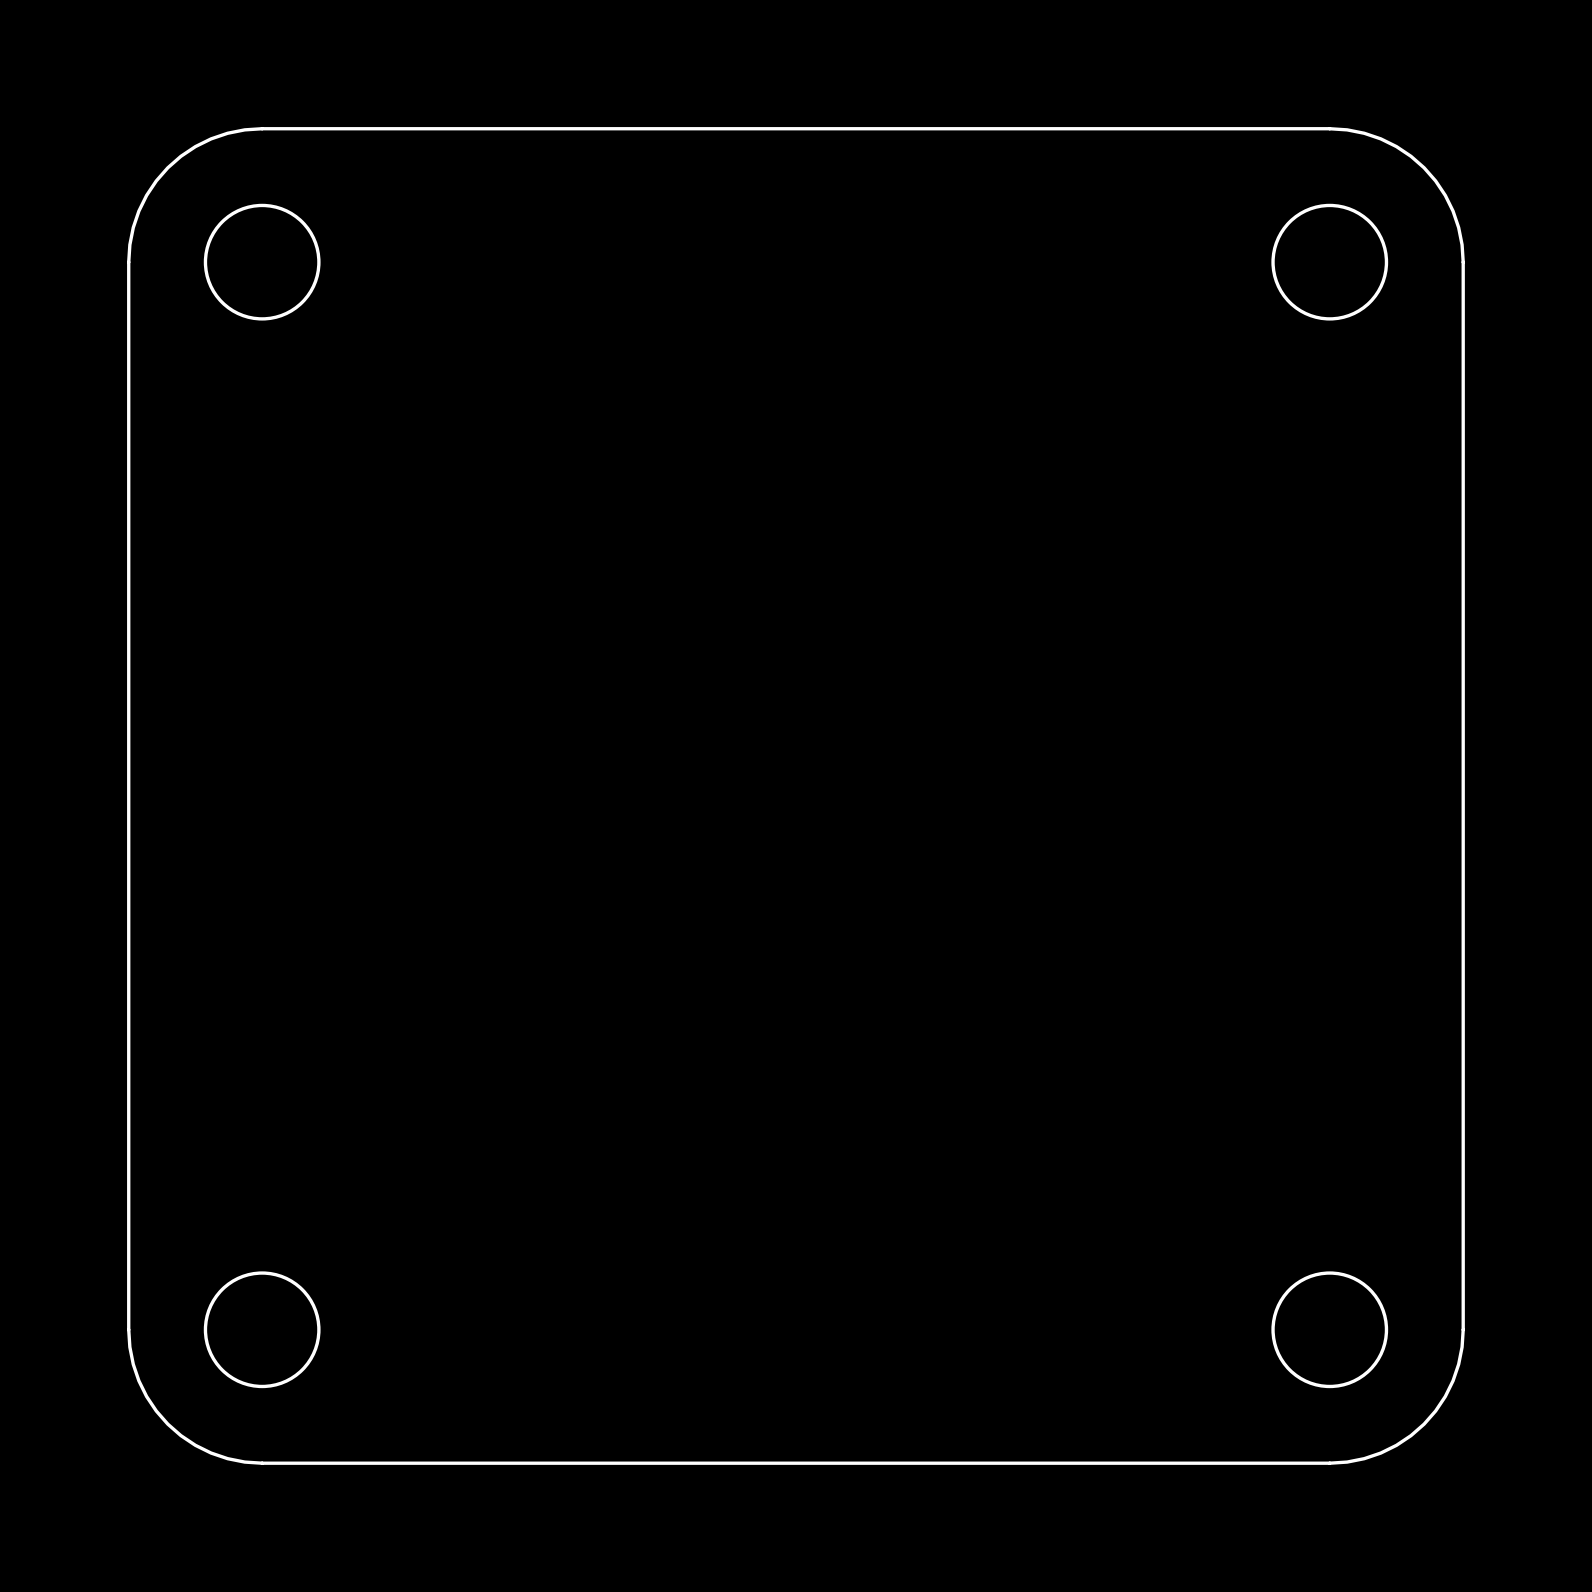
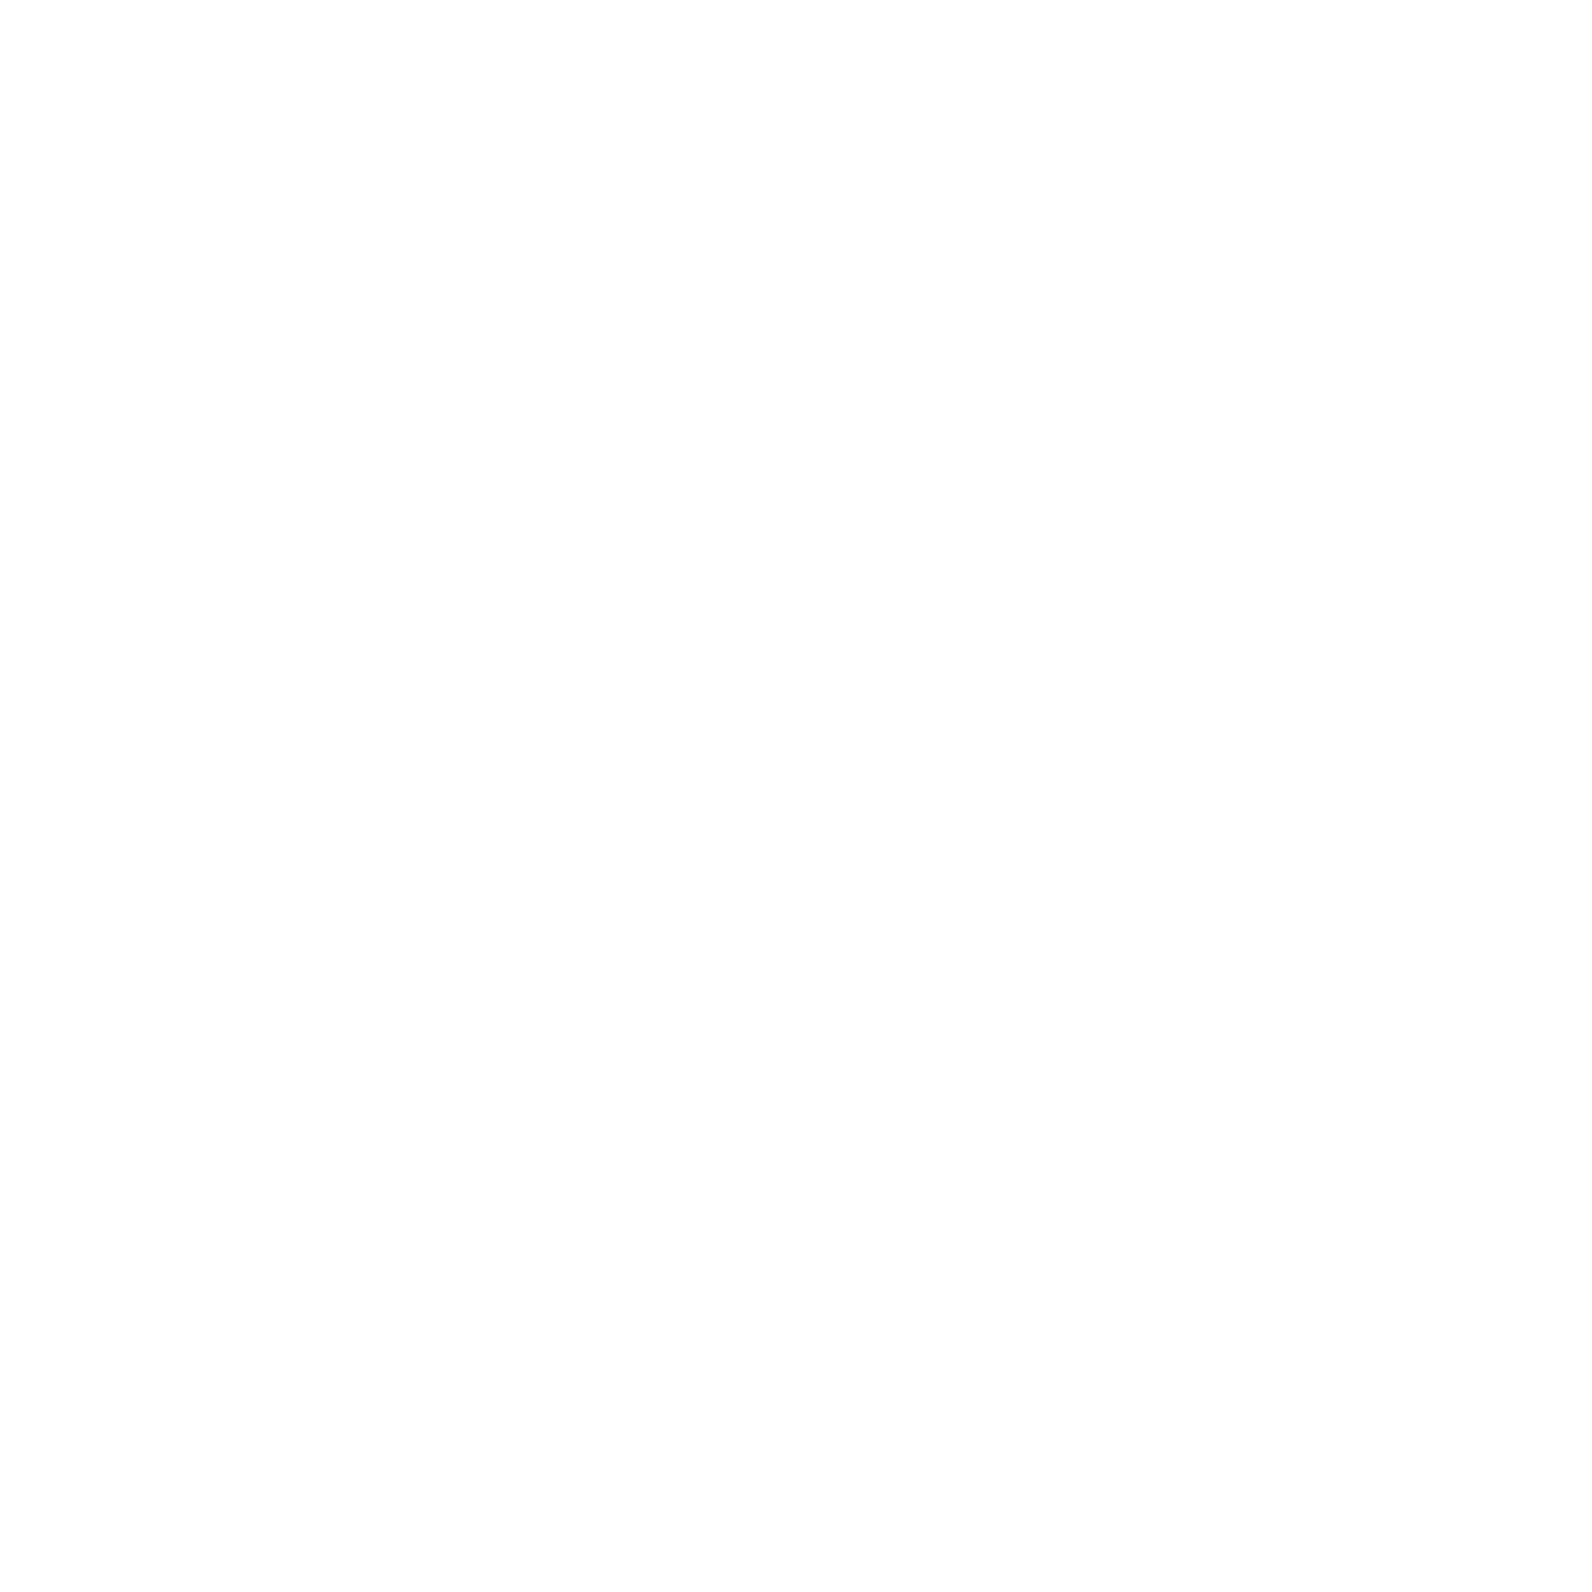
board edge: (1329, 128) (262, 128) (227, 133) (211, 138) (195, 146) (167, 167) (146, 195) (138, 211) (129, 244) (128, 262) (128, 1329) (133, 1364) (138, 1380) (146, 1396) (167, 1424) (180, 1435) (211, 1453) (227, 1458) (262, 1463) (1329, 1463) (1364, 1458) (1380, 1453) (1411, 1435) (1424, 1424) (1435, 1411) (1453, 1380) (1458, 1364) (1463, 1329) (1462, 244) (1453, 211) (1445, 195) (1424, 167) (1411, 156) (1380, 138) (1364, 133) (1329, 128) -> none
round board edge: [203, 203, 321, 321] -> none
round board edge: [1271, 203, 1389, 321] -> none
round board edge: [203, 1271, 321, 1389] -> none
round board edge: [1271, 1271, 1389, 1389] -> none

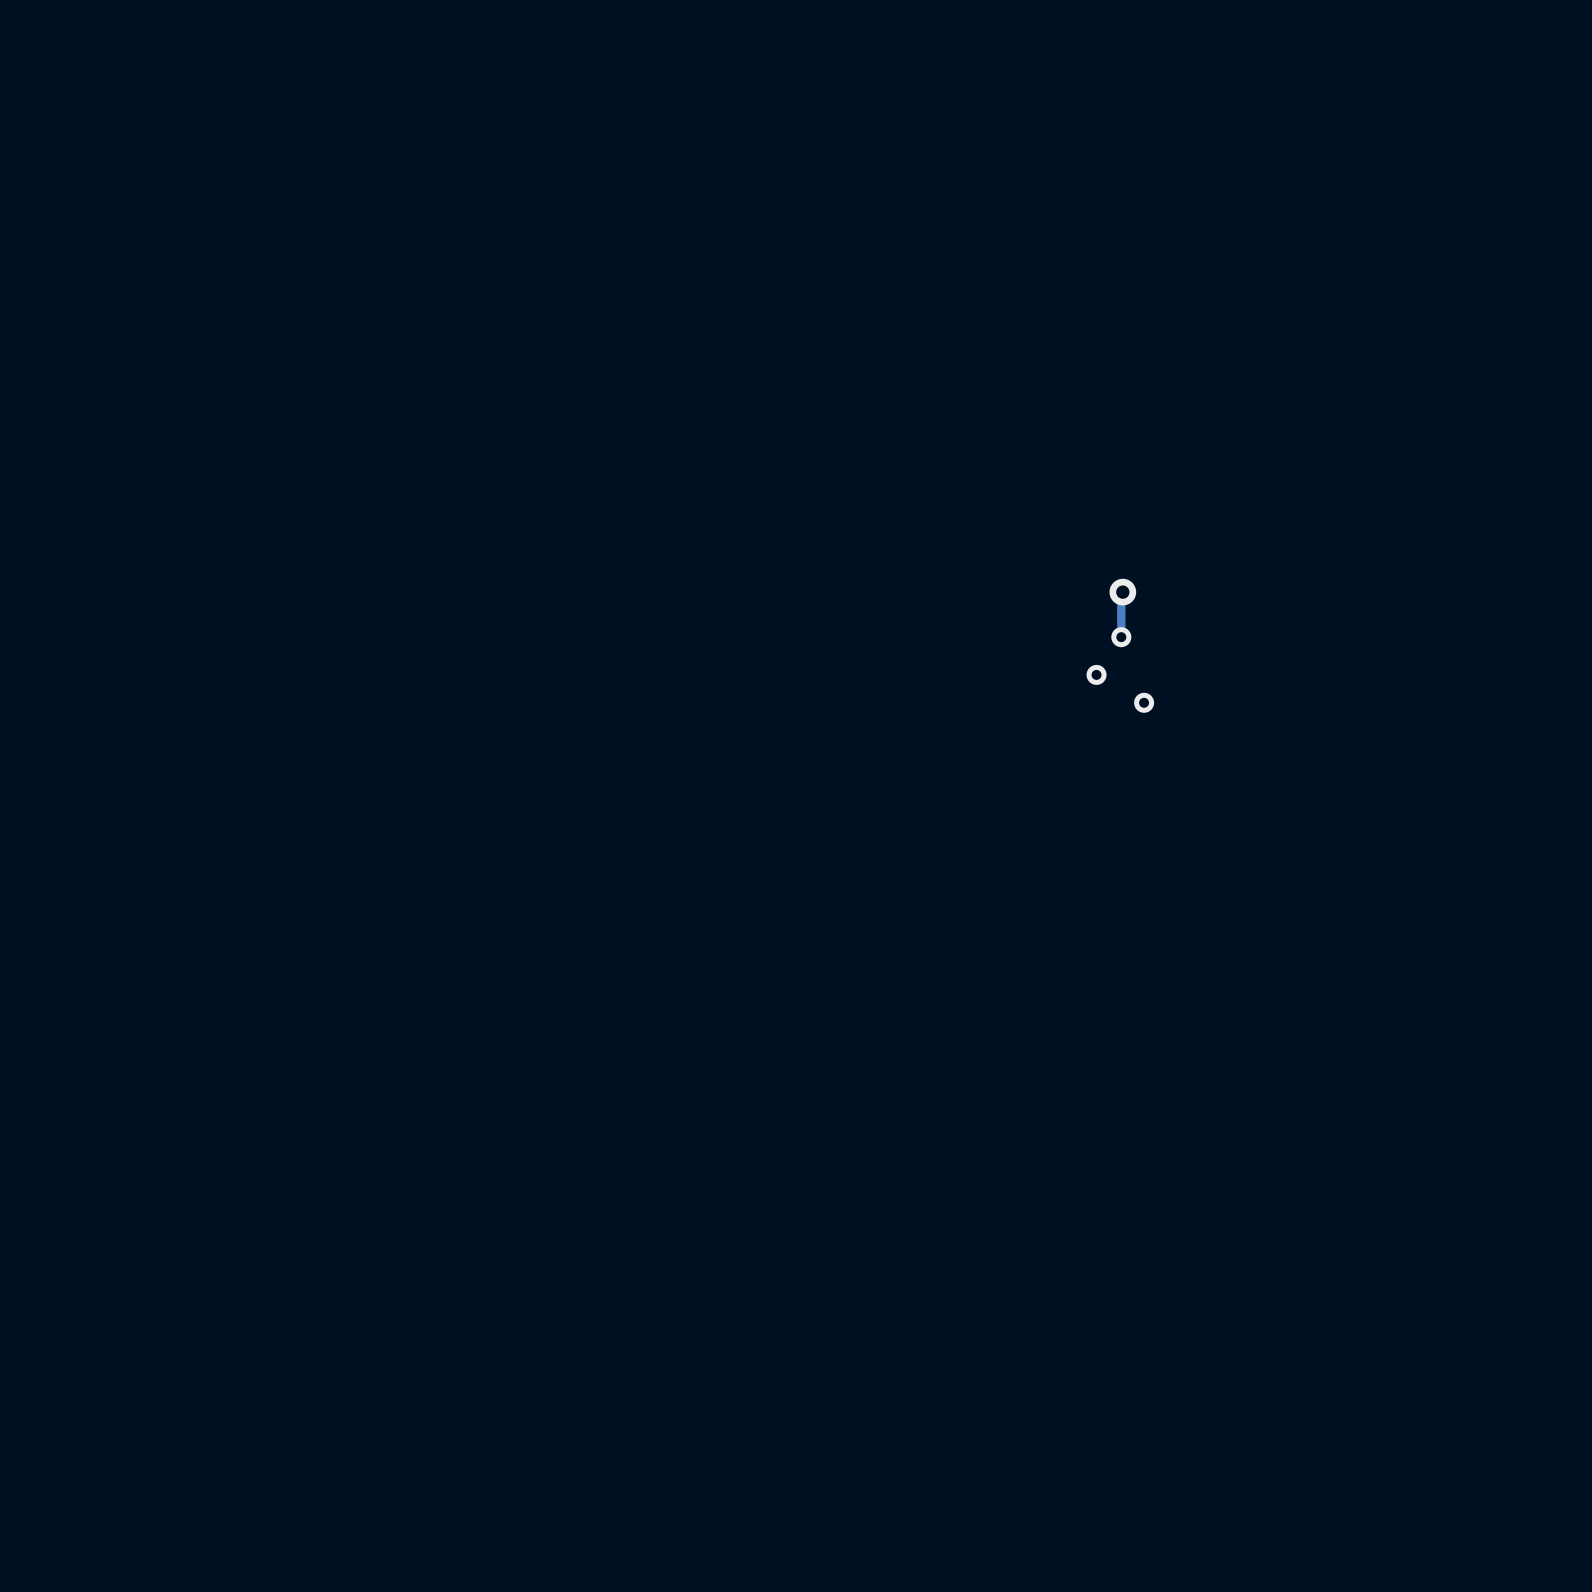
track: none -> (1122, 592) (1121, 637)
via: none -> (1122, 592)
via: none -> (1121, 637)
via: none -> (1096, 674)
via: none -> (1144, 702)

